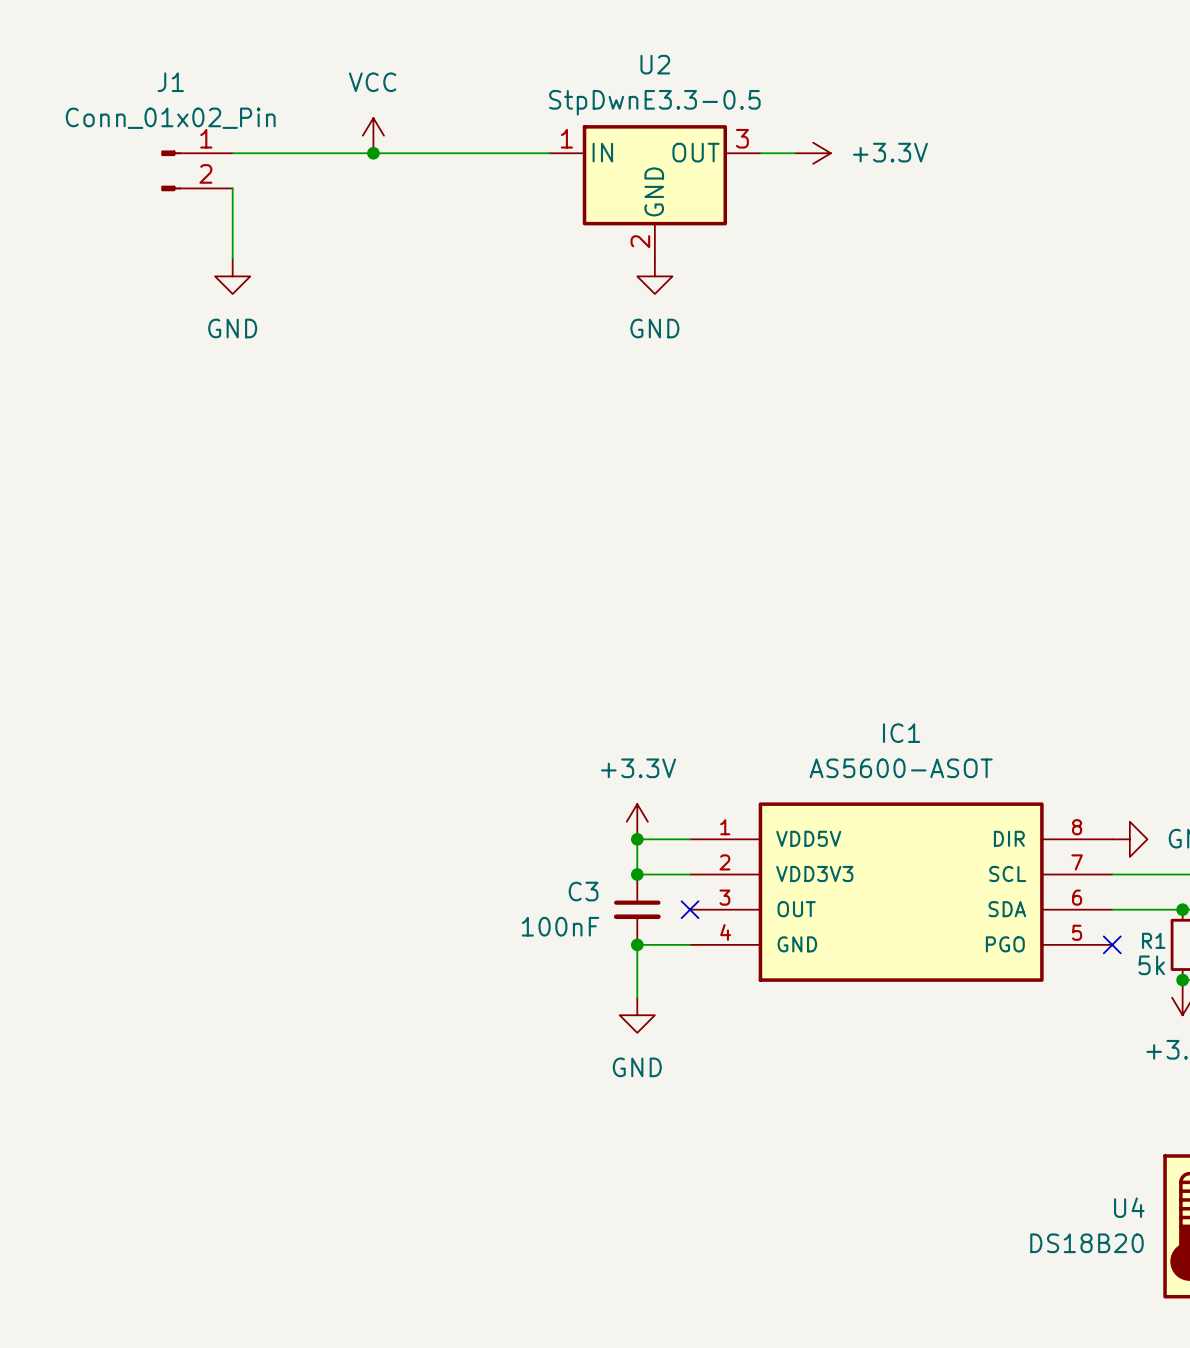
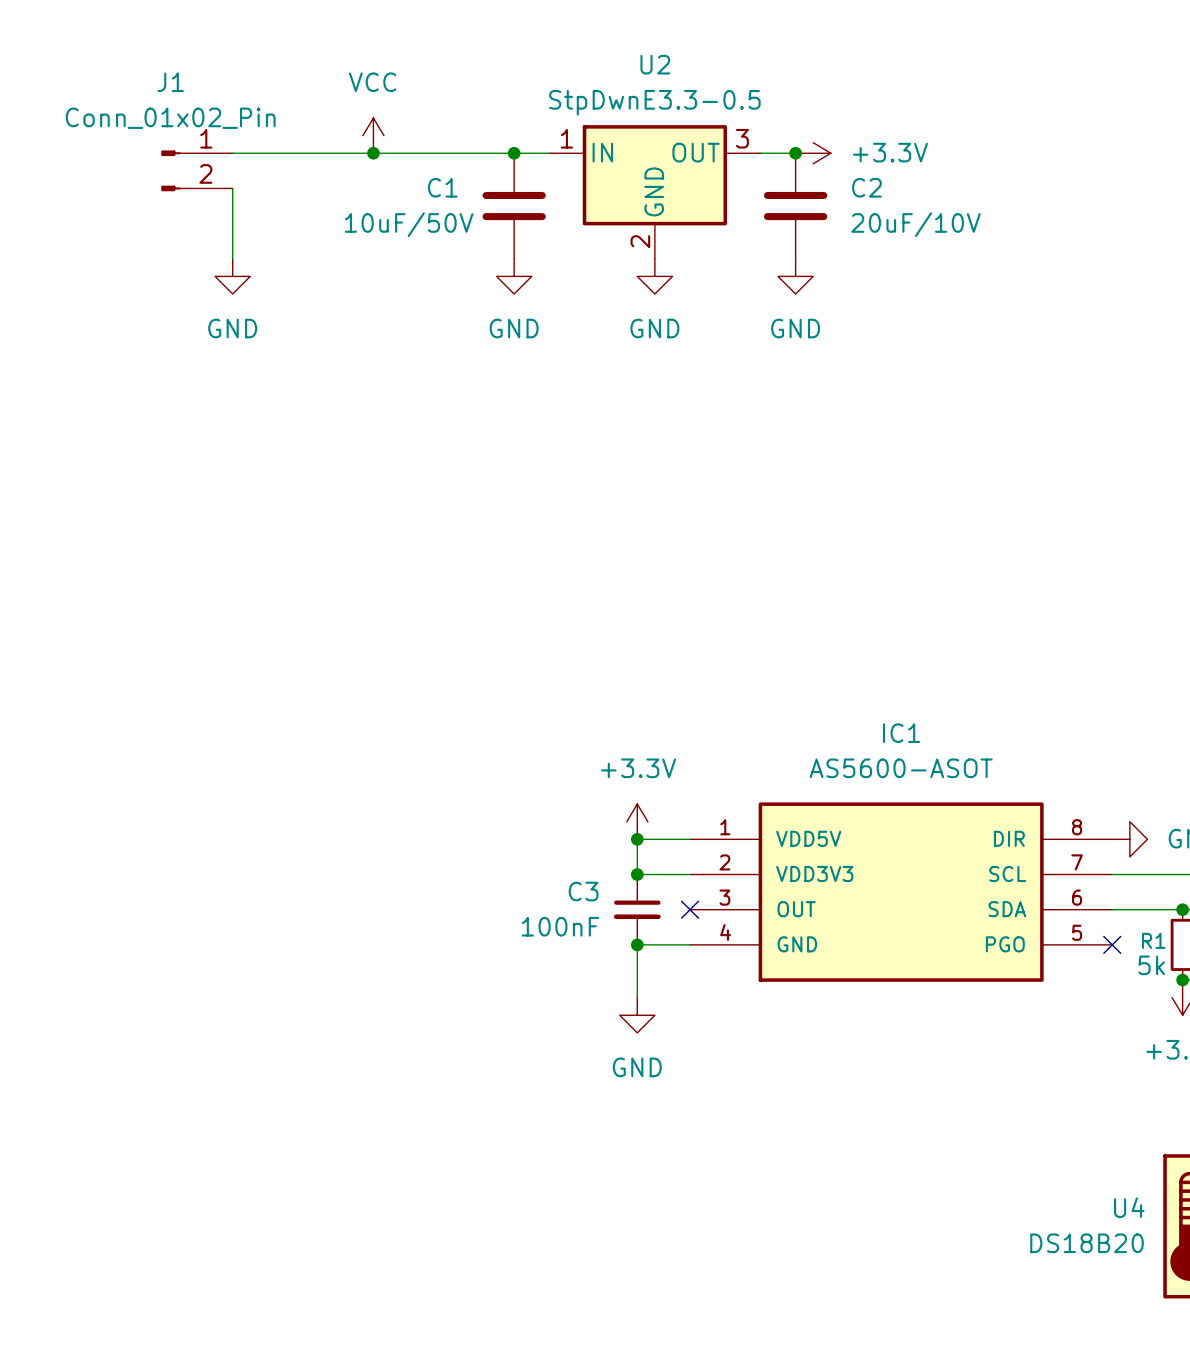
junction: none -> (514, 153)
junction: none -> (795, 153)
C1: none -> 10uF/50V (514, 206)
C2: none -> 20uF/10V (795, 206)
power symbol: none -> GND (514, 276)
power symbol: none -> GND (795, 276)

